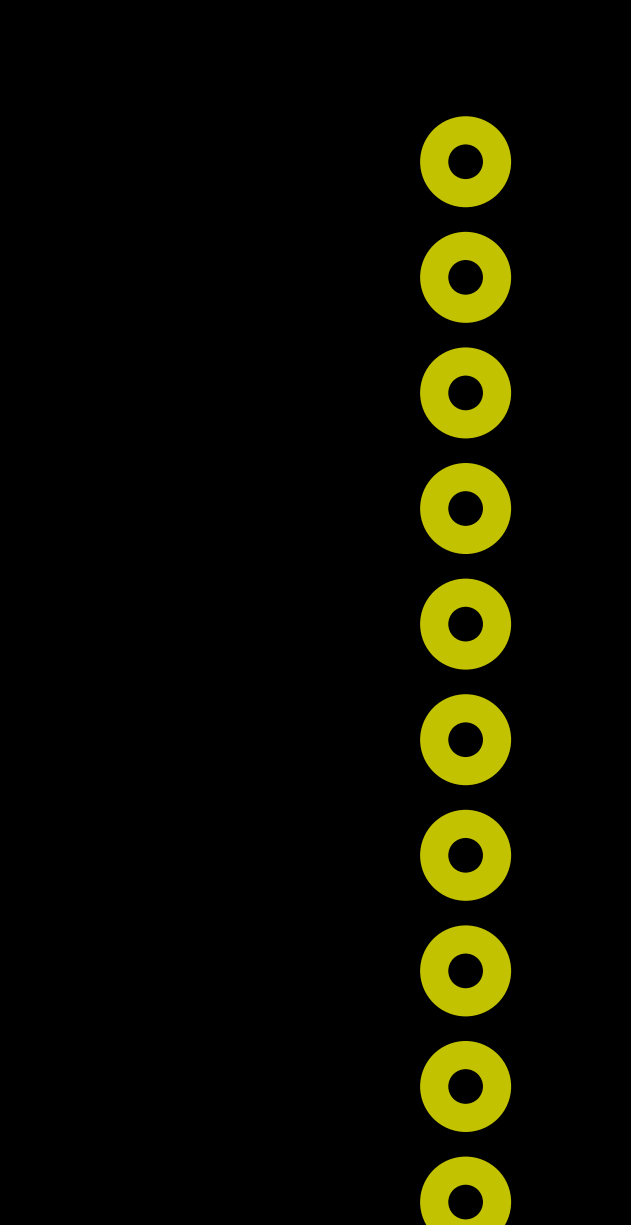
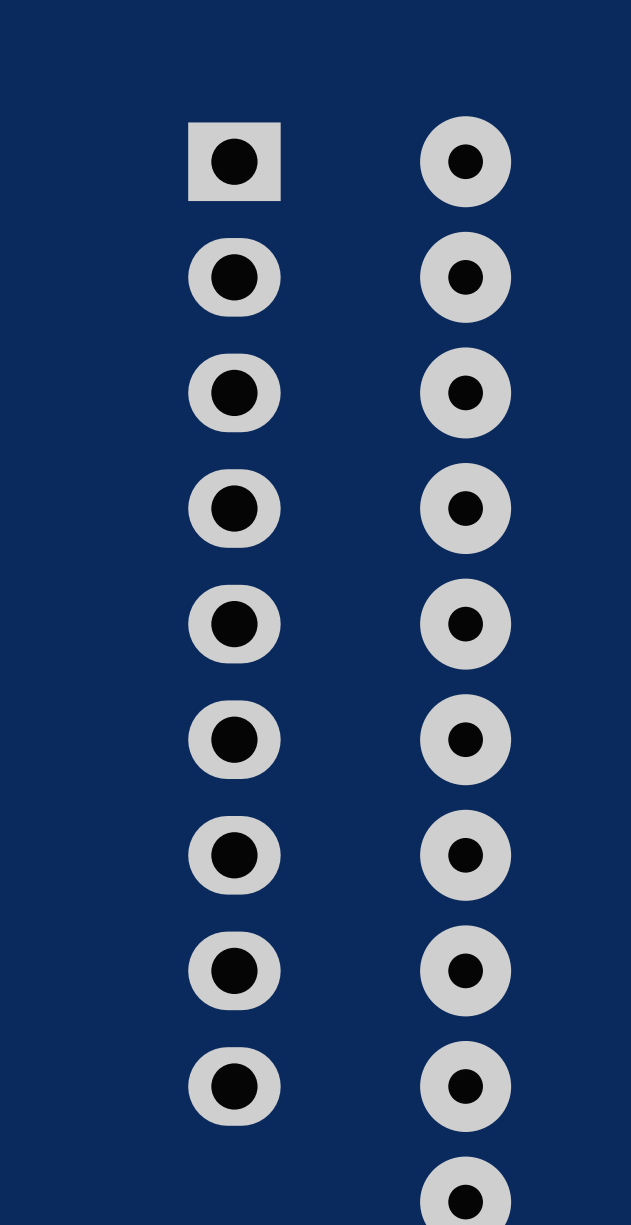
part: none -> (234, 624)

